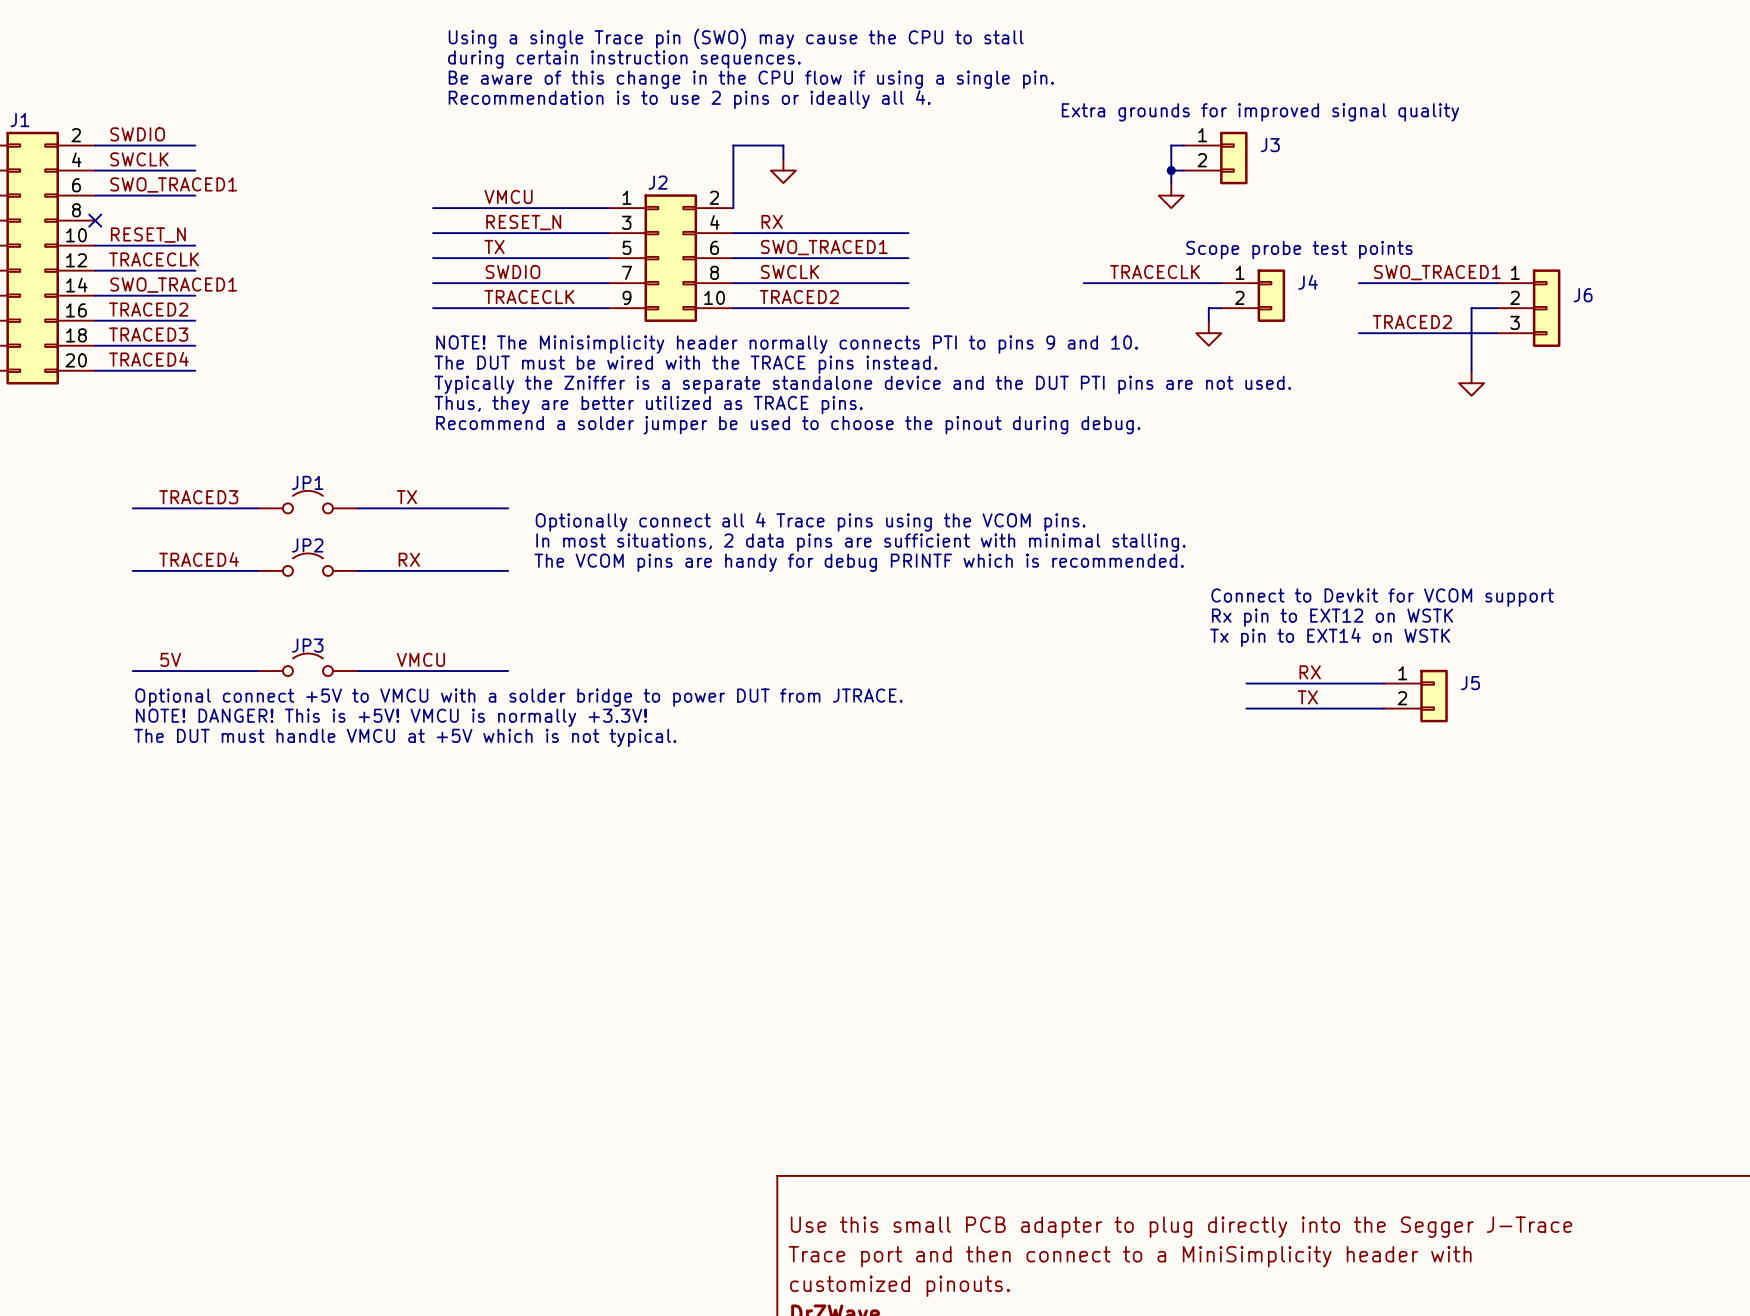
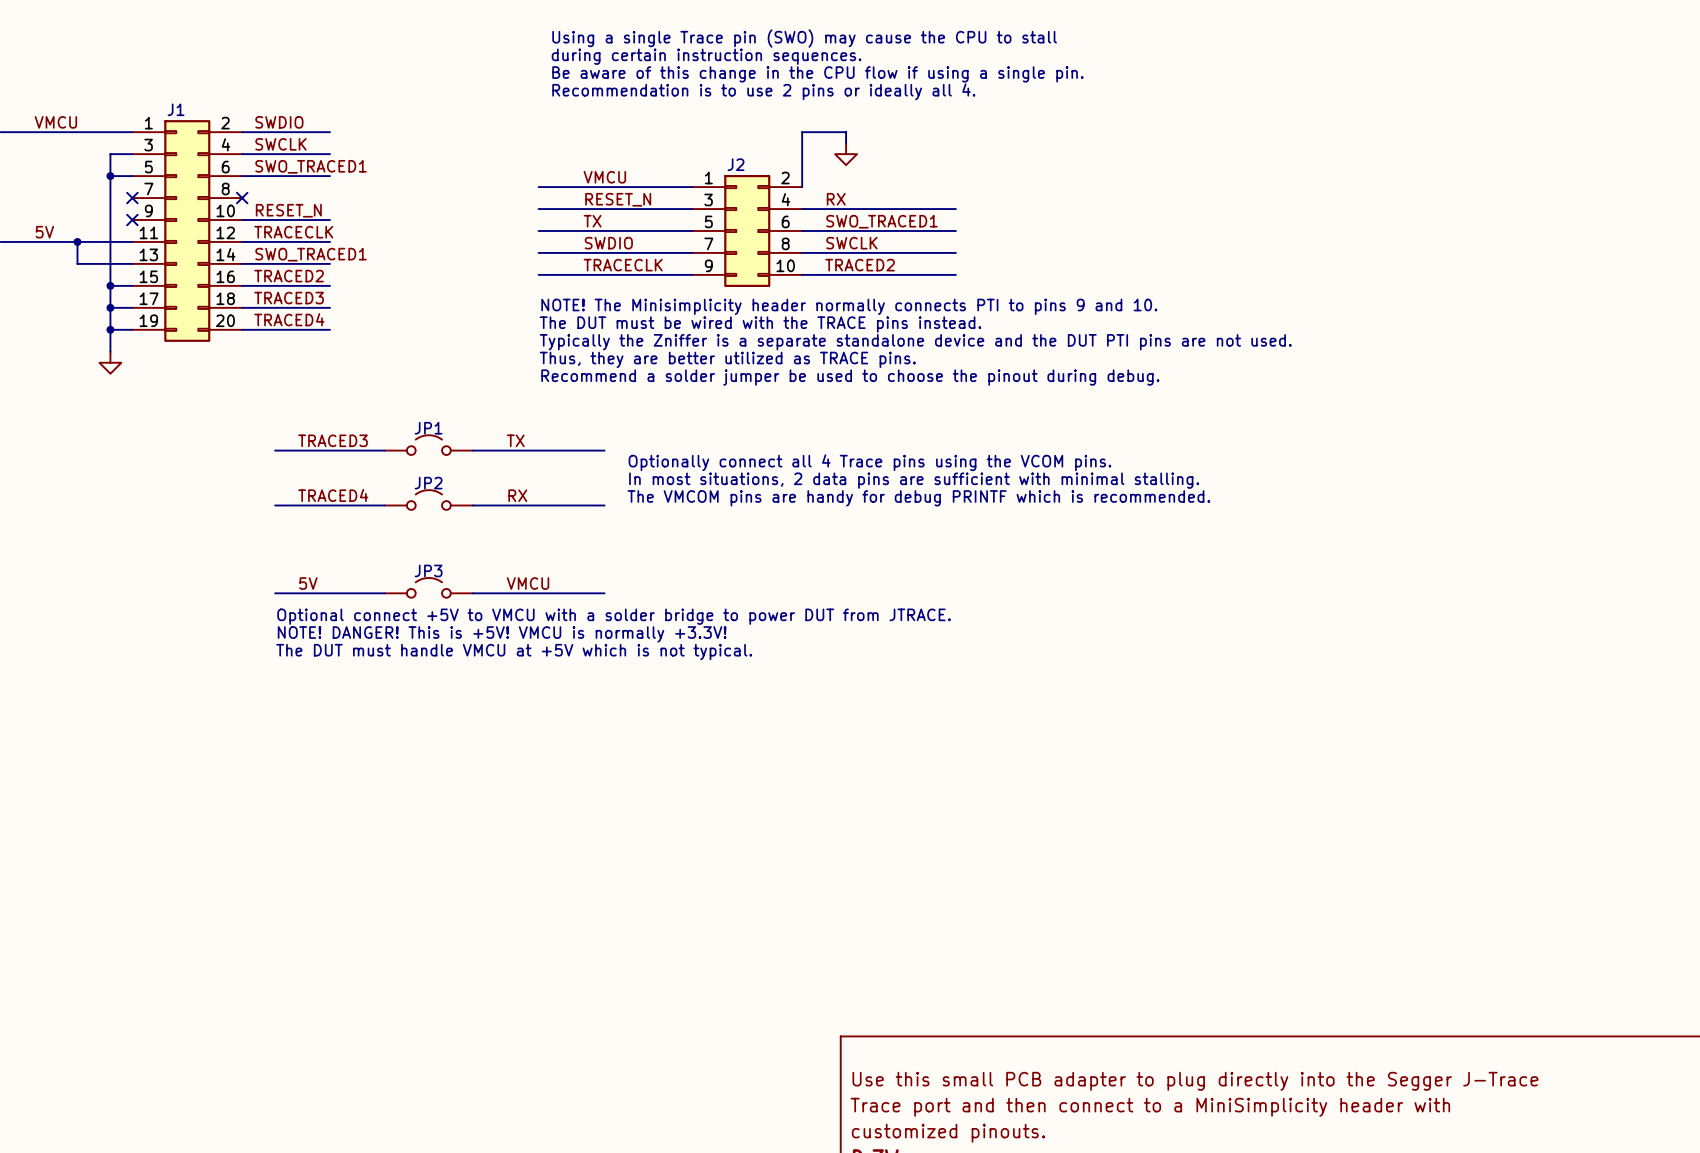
text: Extra grounds for improved signal quality (1260, 112) -> none
wire: (1183, 145) (1171, 145) (1171, 183) -> none
J3: (1215, 158) -> none
wire: (1171, 170) (1183, 170) -> none
junction: (1171, 170) -> none
power symbol: (1171, 195) -> none
text: Scope probe test points (1299, 249) -> none
label: TRACECLK (1154, 272) -> none
label: SWO_TRACED1 (1437, 272) -> none
wire: (1083, 283) (1221, 283) -> none
wire: (1358, 283) (1496, 283) -> none
J4: (1253, 295) -> none
wire: (1221, 308) (1208, 308) (1208, 320) -> none
wire: (1496, 308) (1471, 308) (1471, 370) -> none
J6: (1528, 308) -> none
label: TRACED2 (1412, 322) -> none
power symbol: (1208, 333) -> none
wire: (1358, 333) (1496, 333) -> none
power symbol: (1471, 383) -> none
text: The VCOM pins are handy for debug PRINTF which is recommended. (859, 562) -> The VMCOM pins are handy for debug PRINTF which is recommended. (918, 498)
text: Connect to Devkit for VCOM support (1382, 597) -> none
text: Rx pin to EXT12 on WSTK (1332, 617) -> none
text: Tx pin to EXT14 on WSTK (1330, 637) -> none
label: RX (1310, 672) -> none
wire: (1246, 683) (1383, 683) -> none
J5: (1415, 696) -> none
label: TX (1307, 697) -> none
wire: (1246, 708) (1383, 708) -> none

